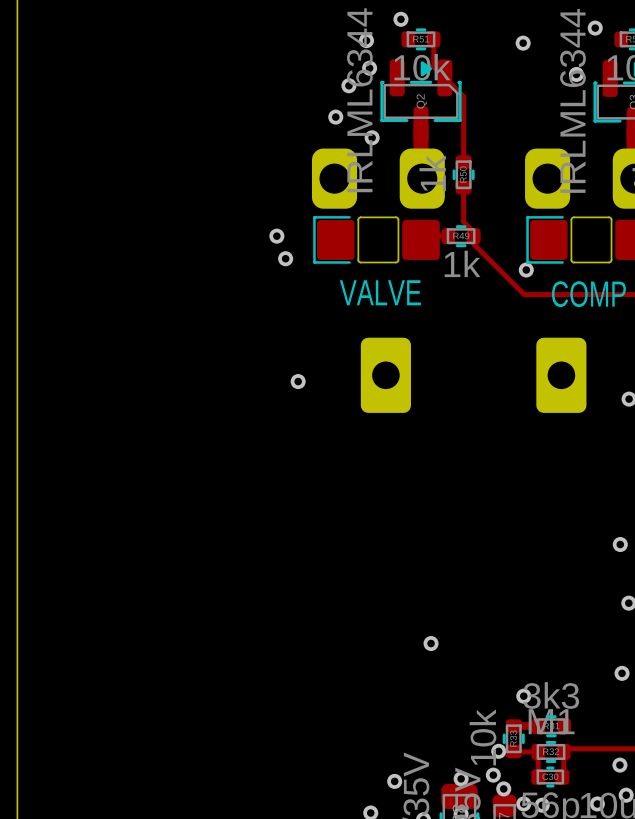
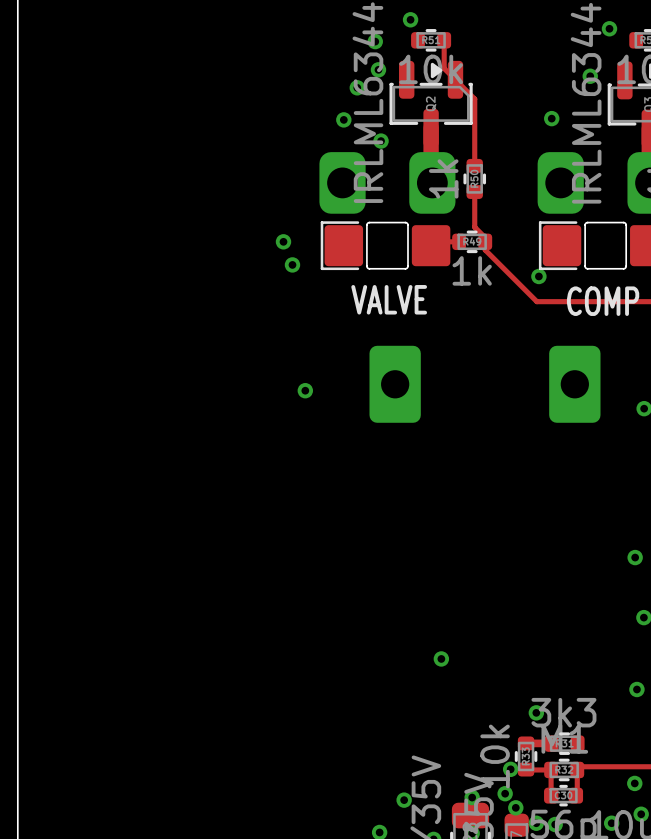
via position: (523, 43) -> (551, 118)

